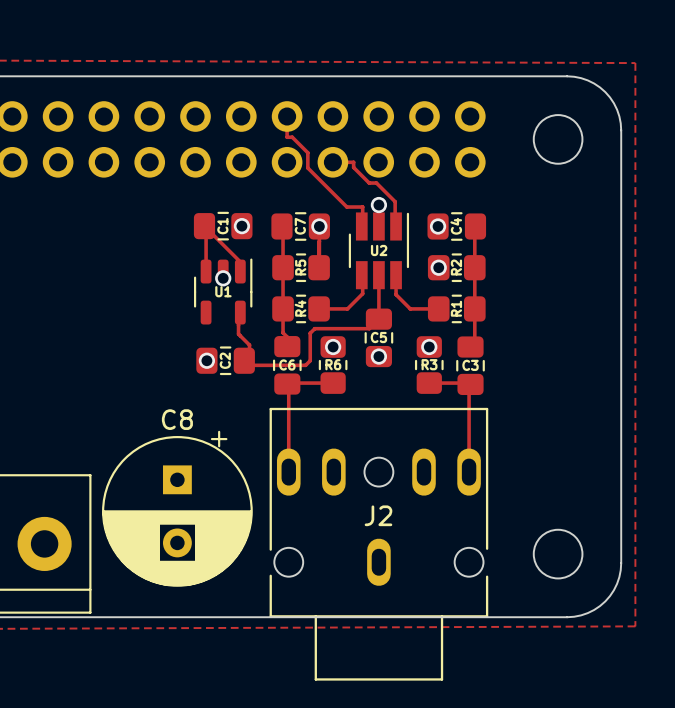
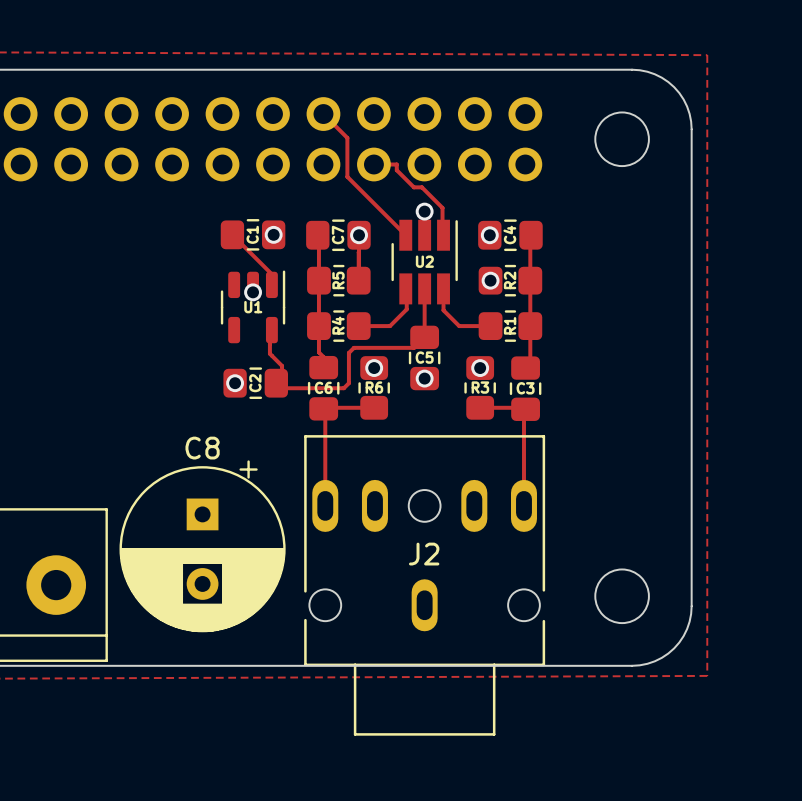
track: (287, 116) (287, 137) (292, 137) (307, 152) (307, 167) (346, 207) (362, 207) (362, 226) -> (323, 114) (347, 137) (347, 176) (405, 235)
track: (206, 227) (206, 271) -> none

